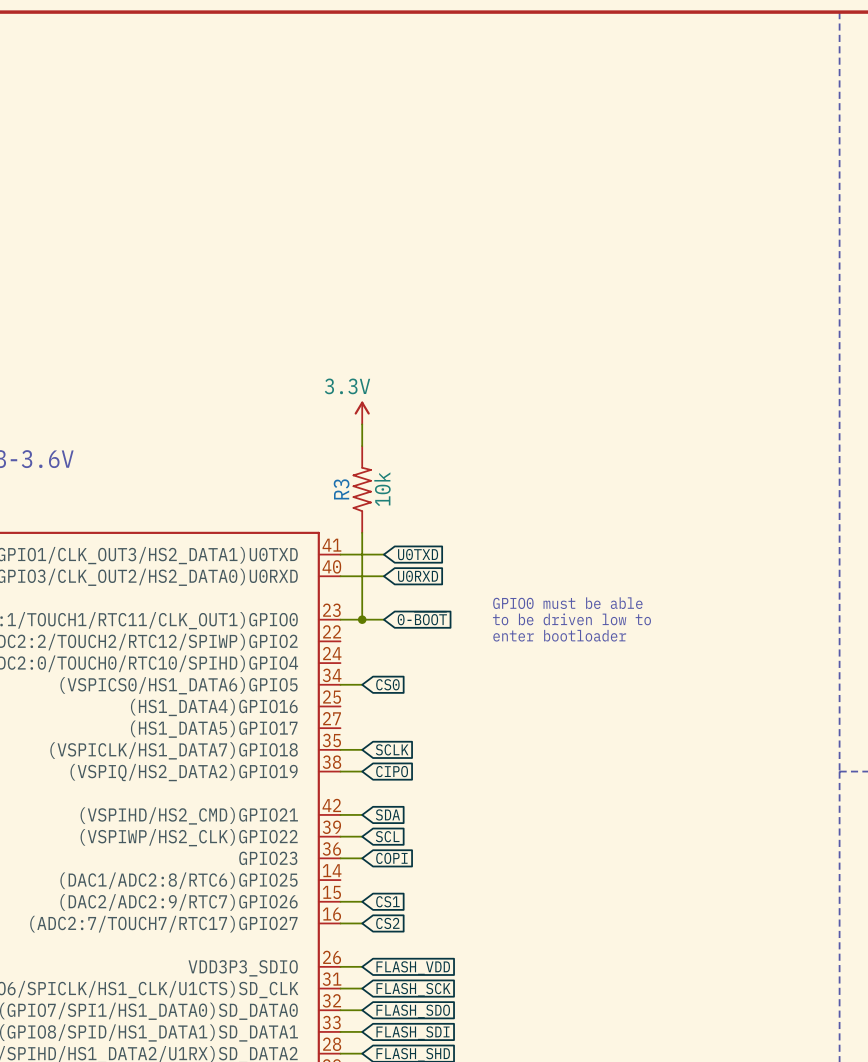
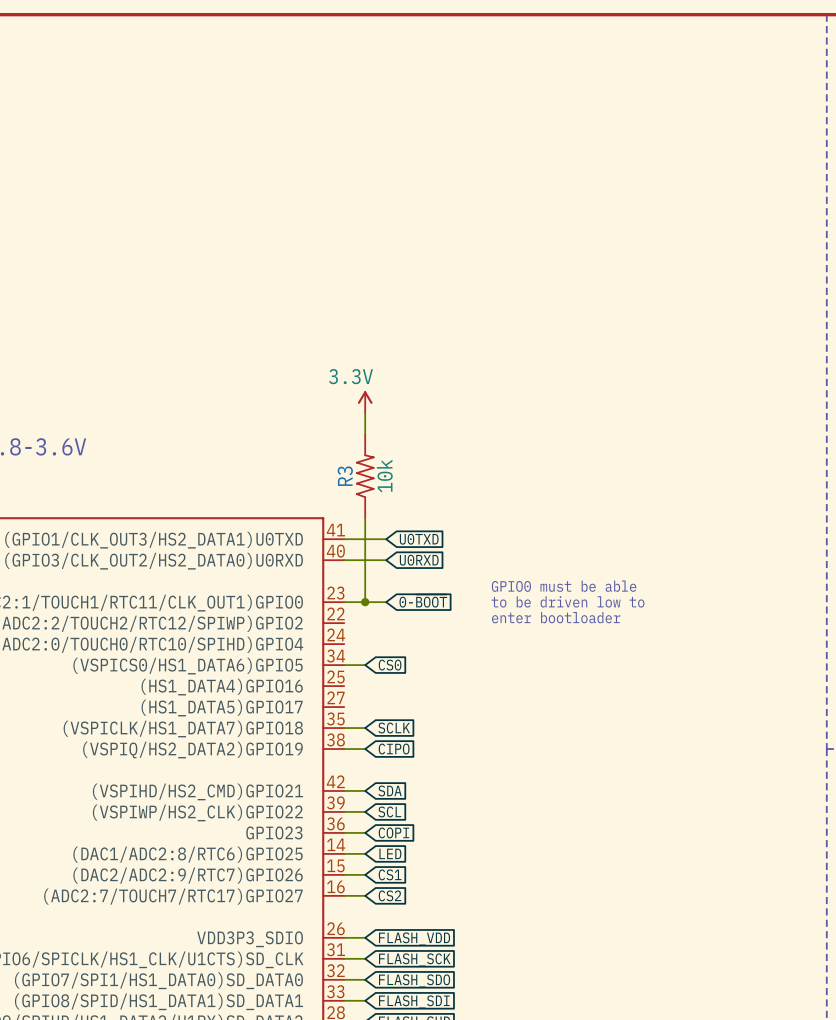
wire: none -> (344, 853) (365, 853)
global label: none -> LED (390, 853)

